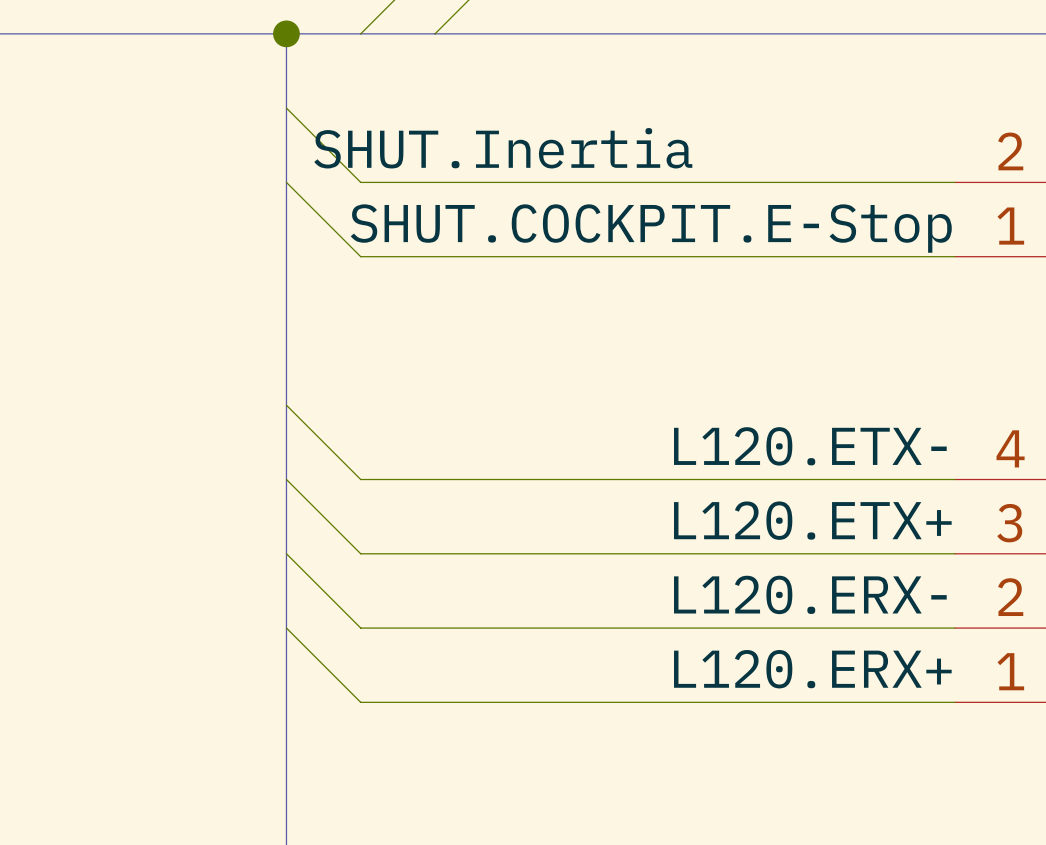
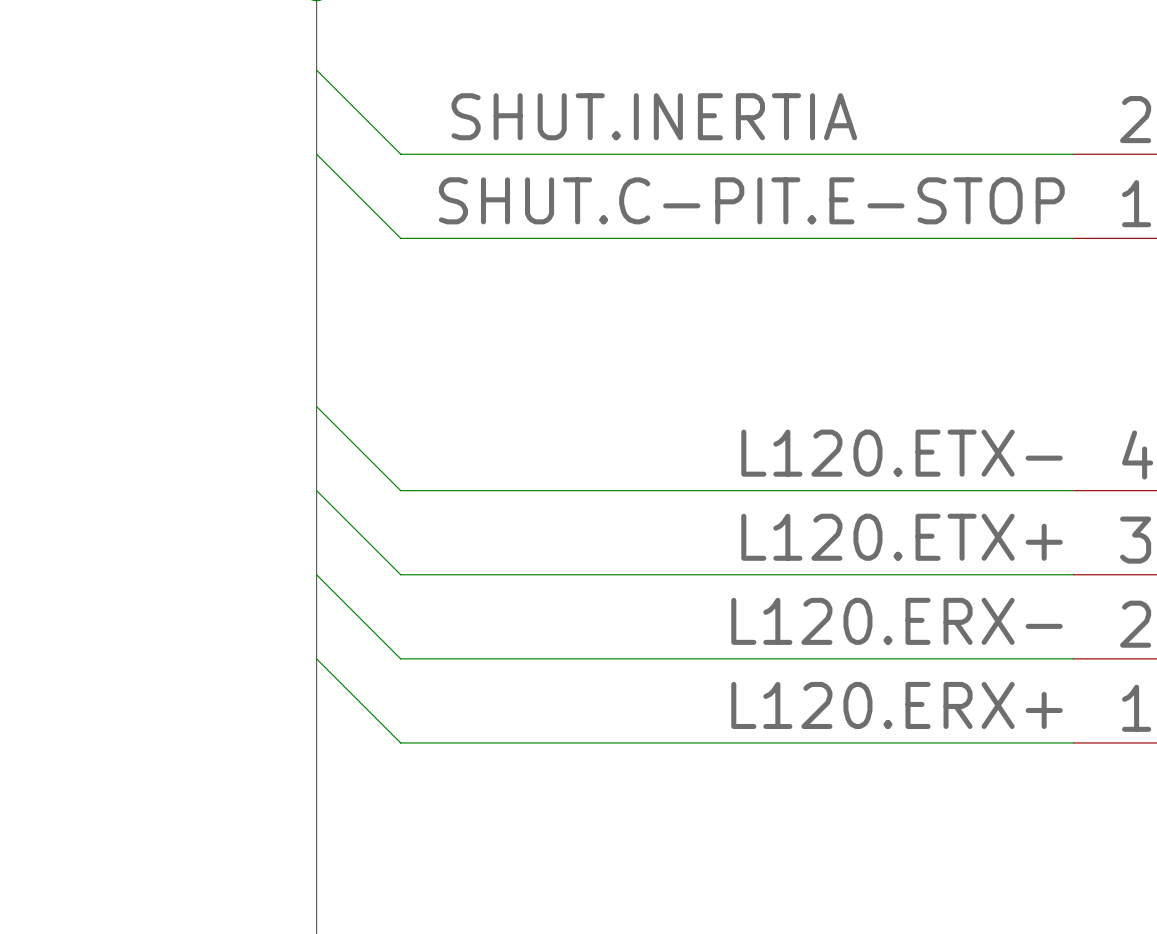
label: SHUT.Inertia (503, 148) -> none
label: none -> SHUT.INERTIA (654, 116)
label: SHUT.COCKPIT.E-Stop (651, 228) -> SHUT.C-PIT.E-STOP (751, 200)

